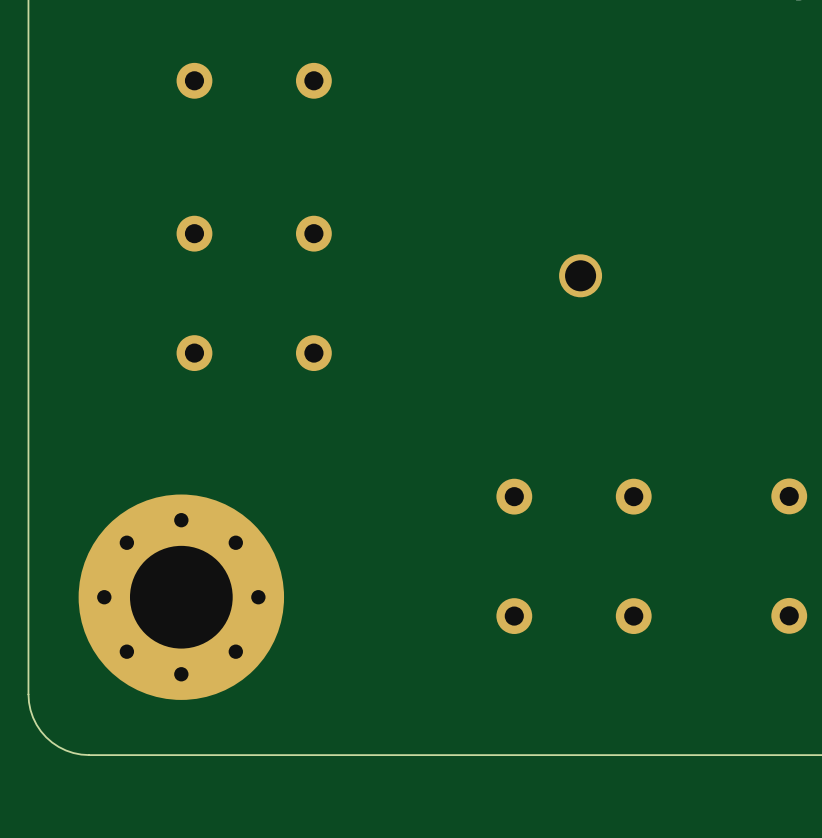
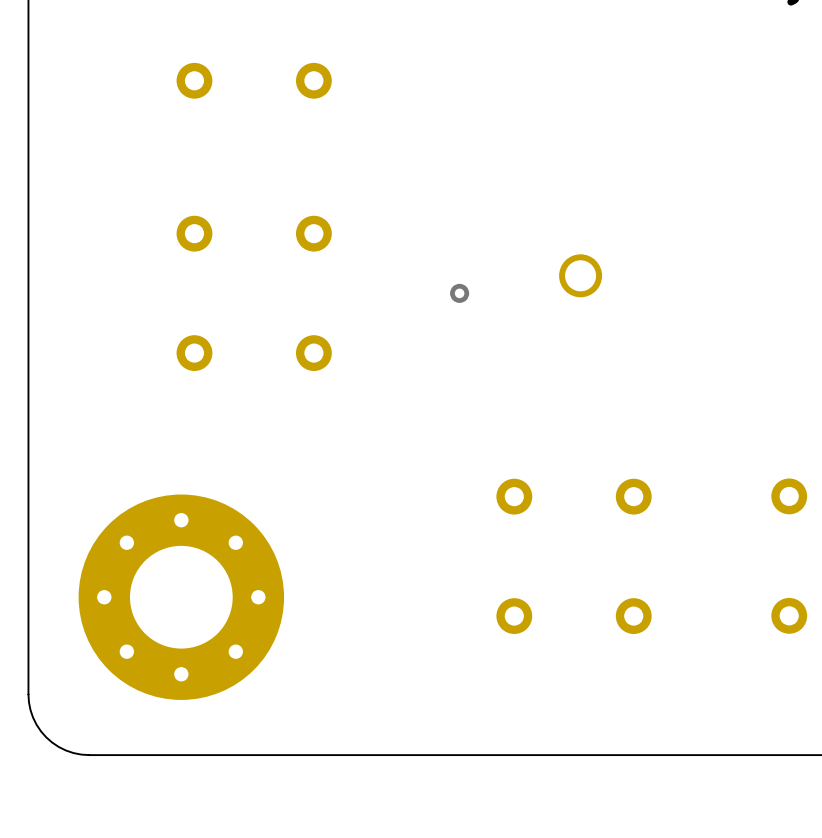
via: none -> (459, 293)

